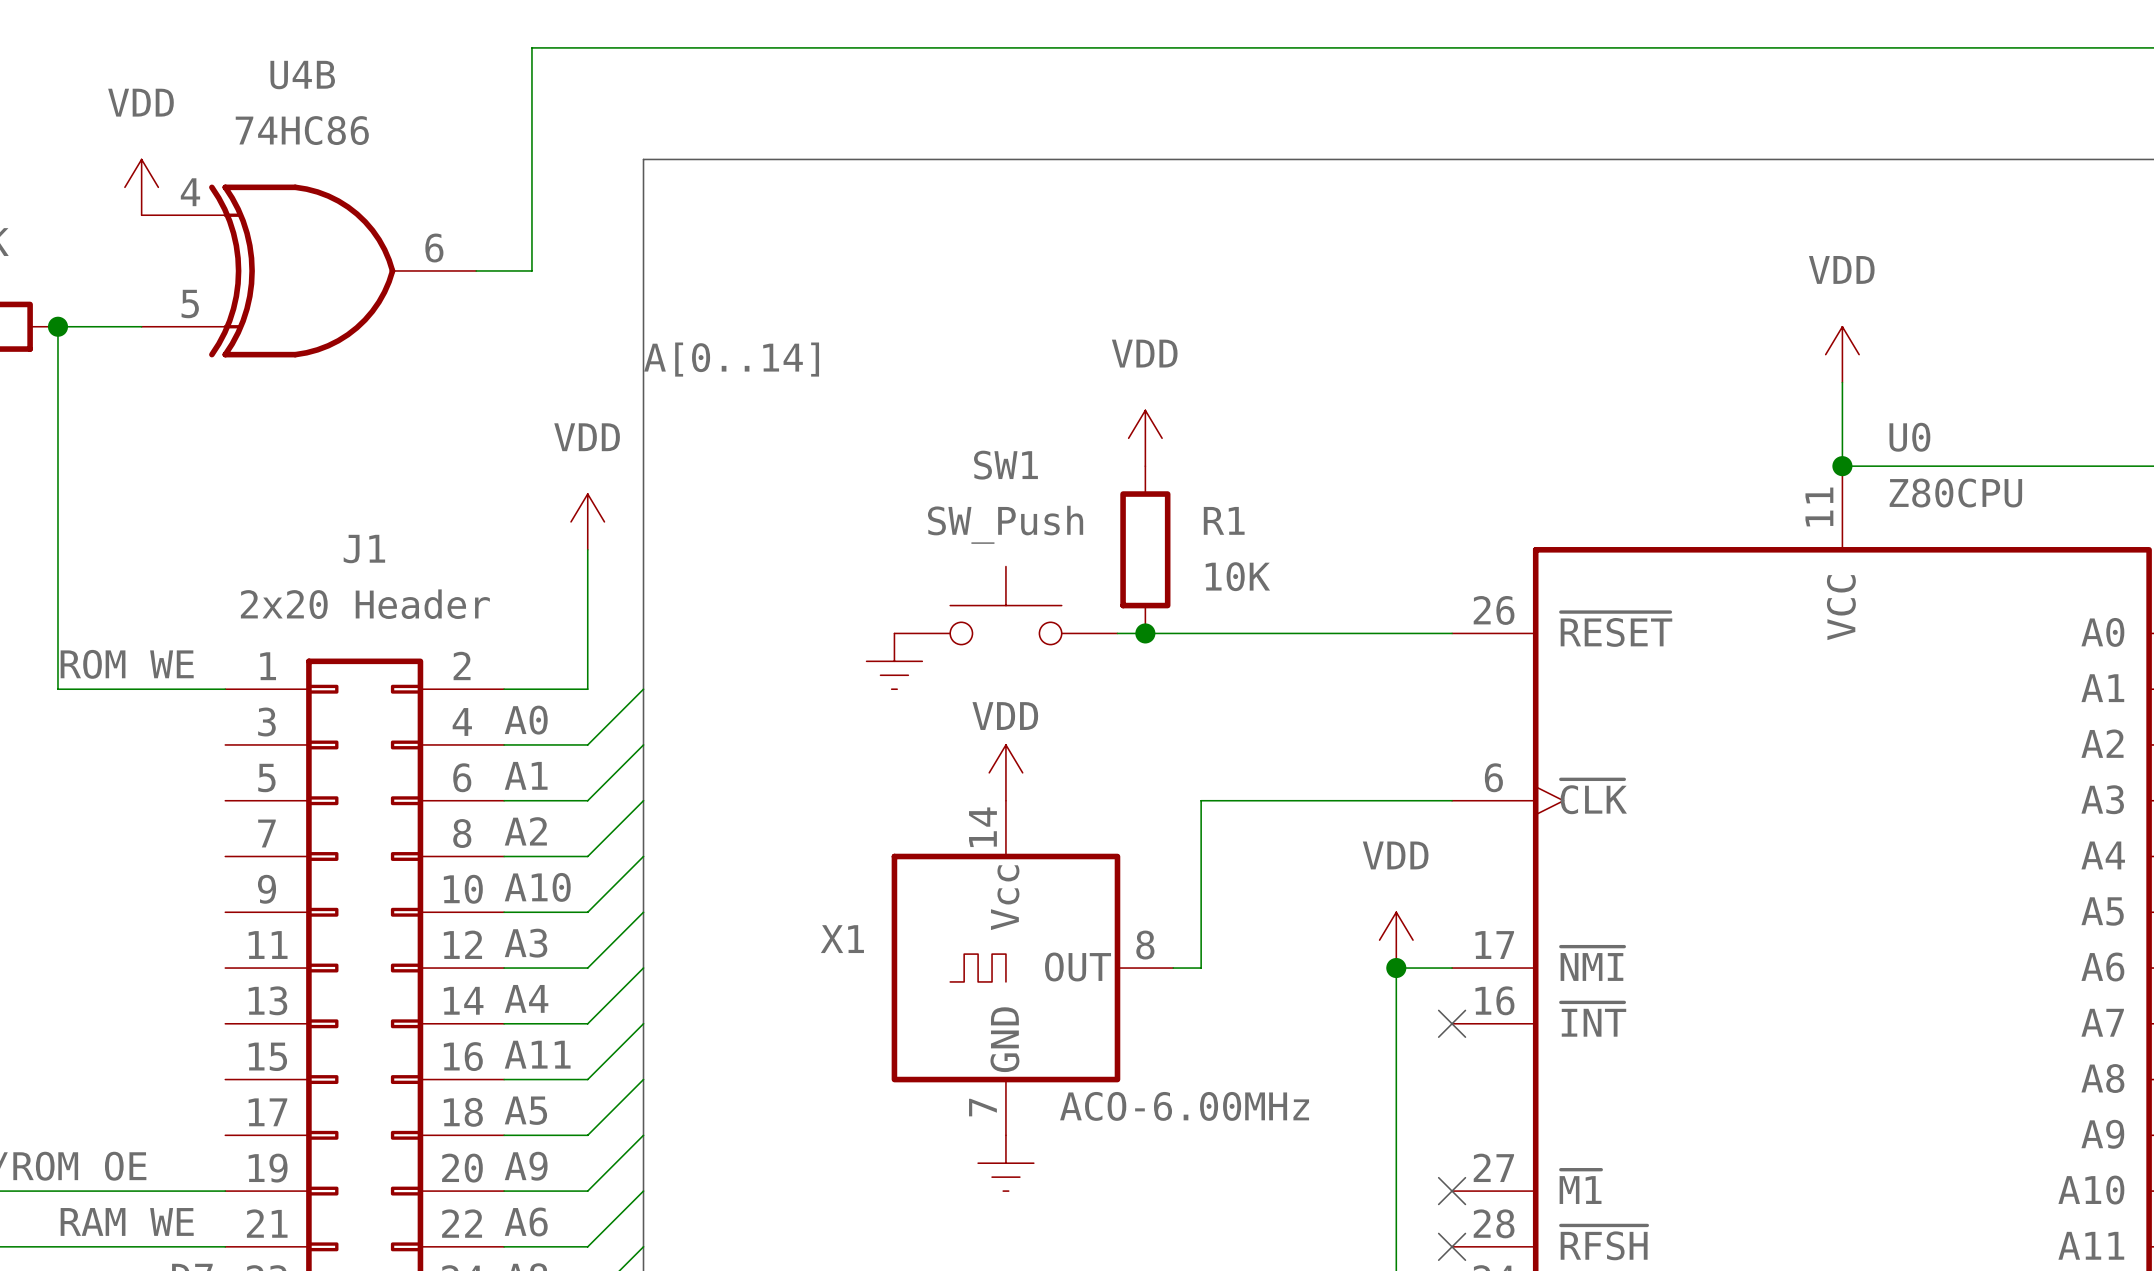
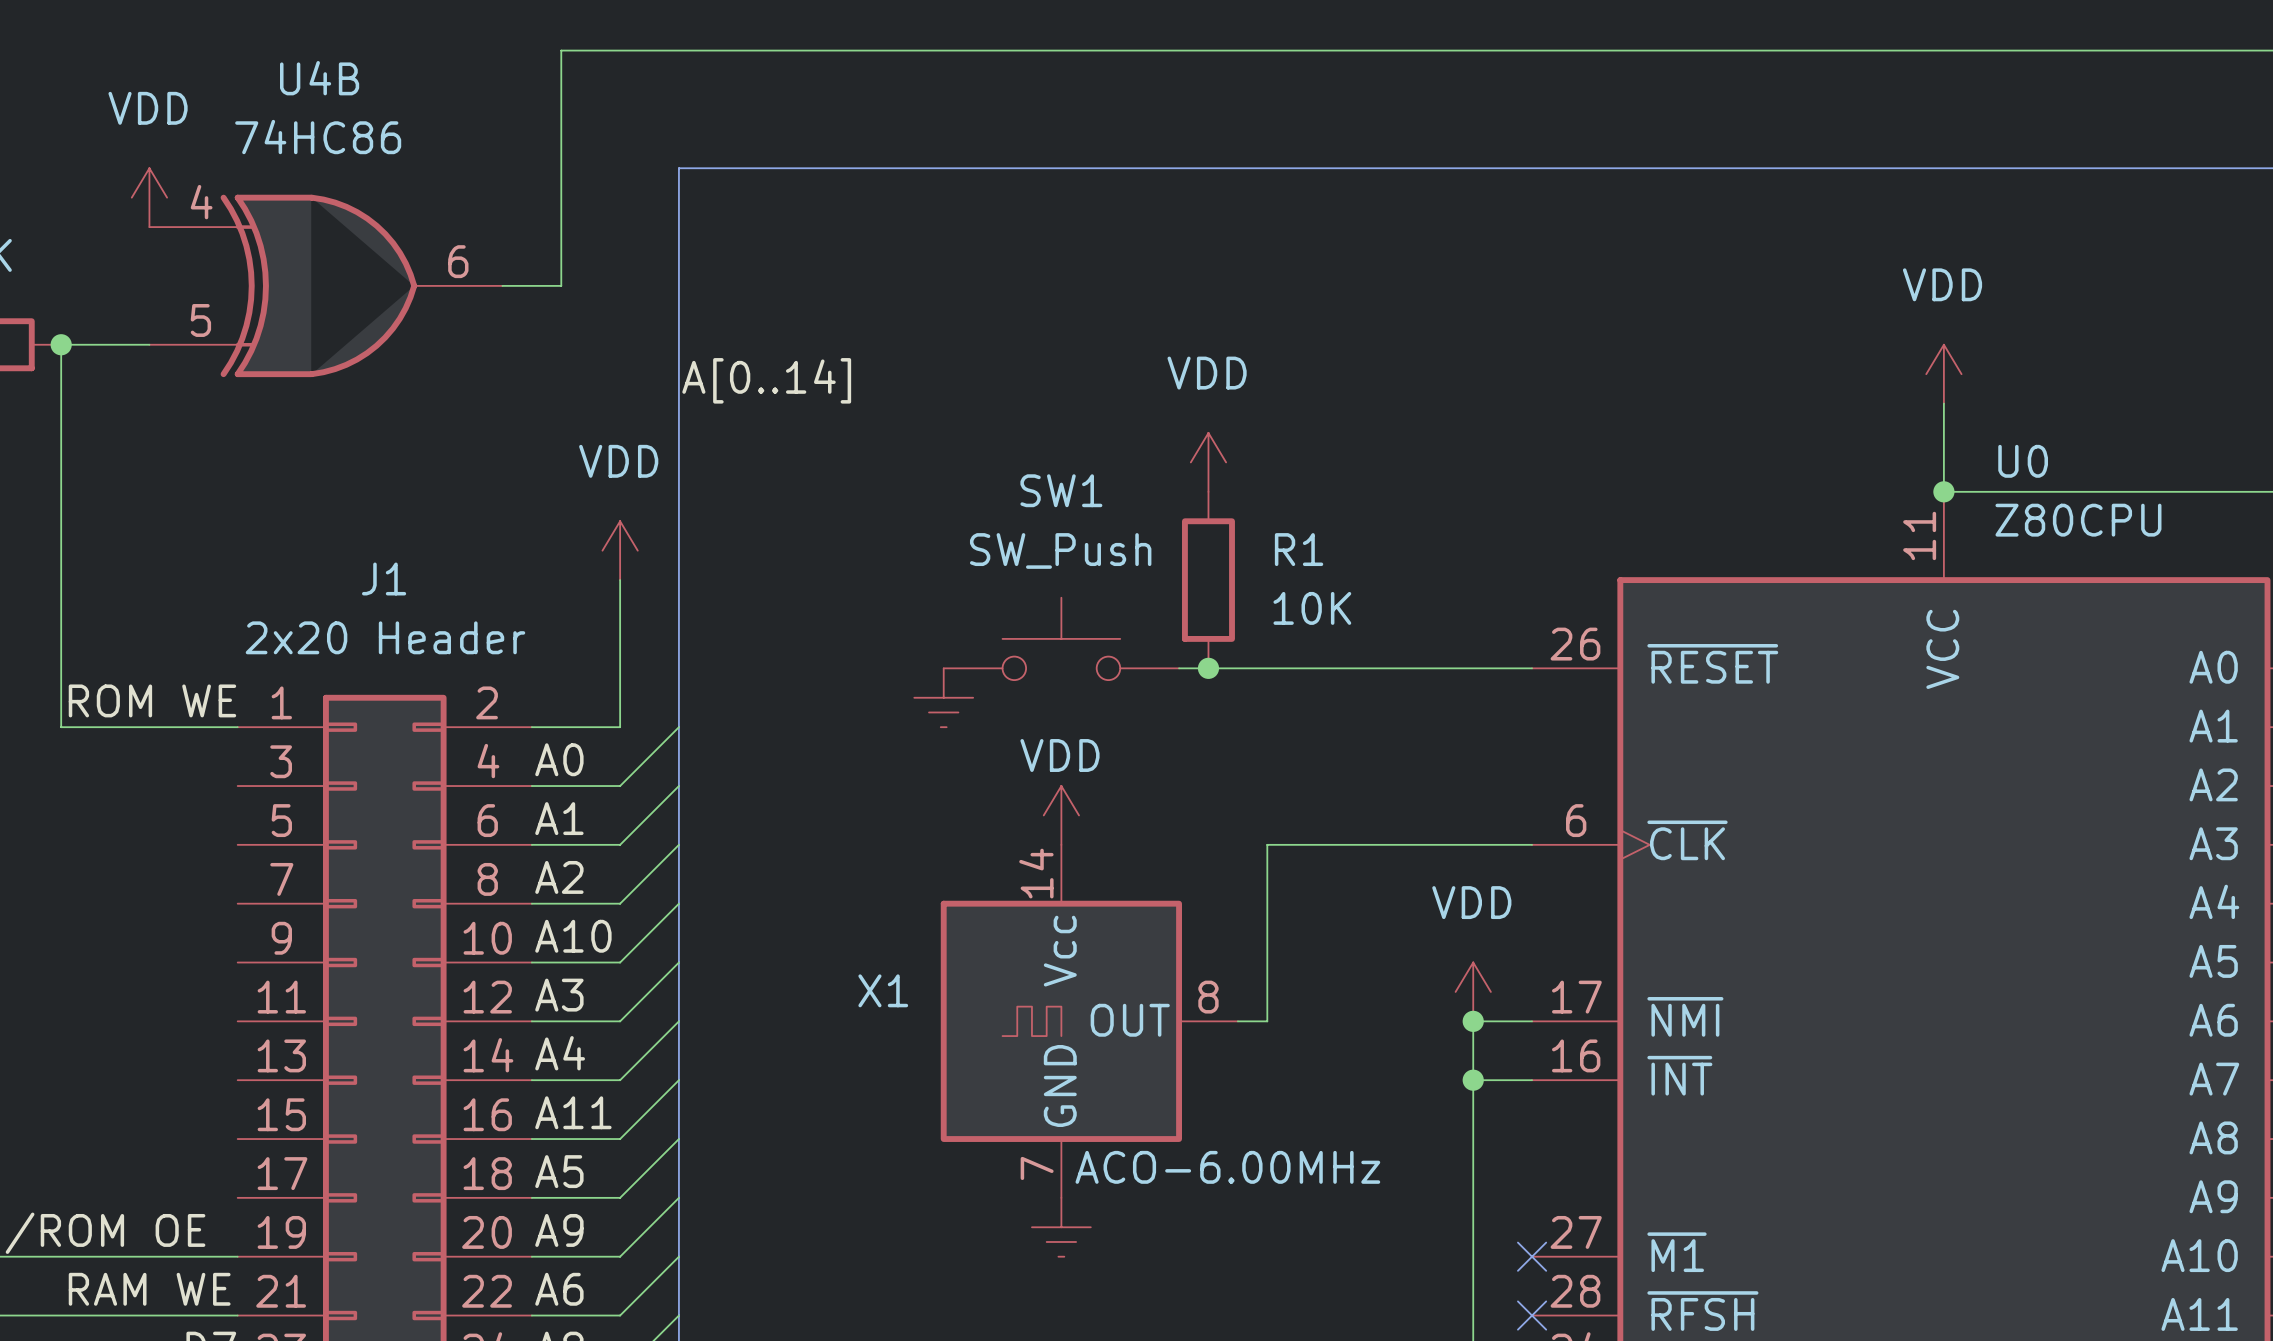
wire: none -> (1473, 1080) (1532, 1080)
junction: none -> (1473, 1080)
no-connect mark: (1452, 1023) -> none

